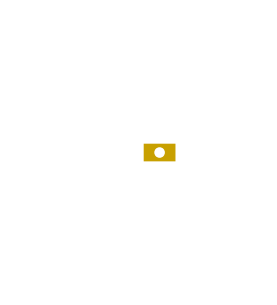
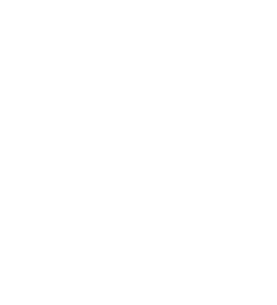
part: (159, 152) -> none

